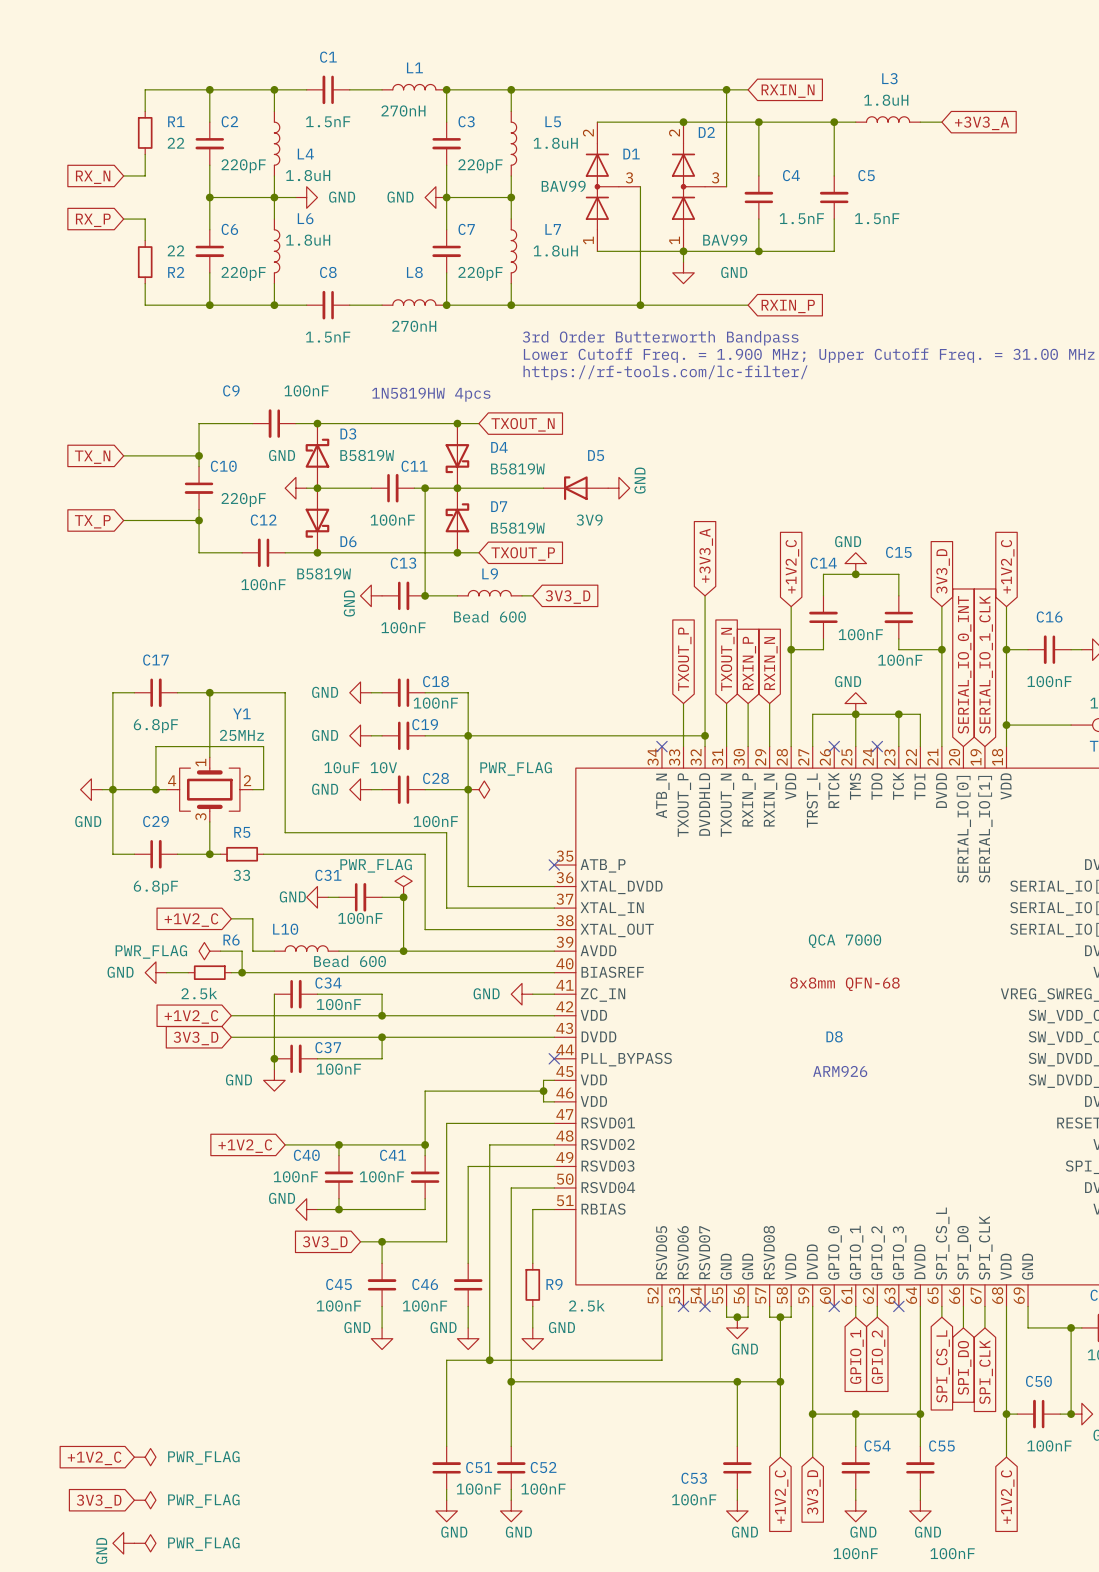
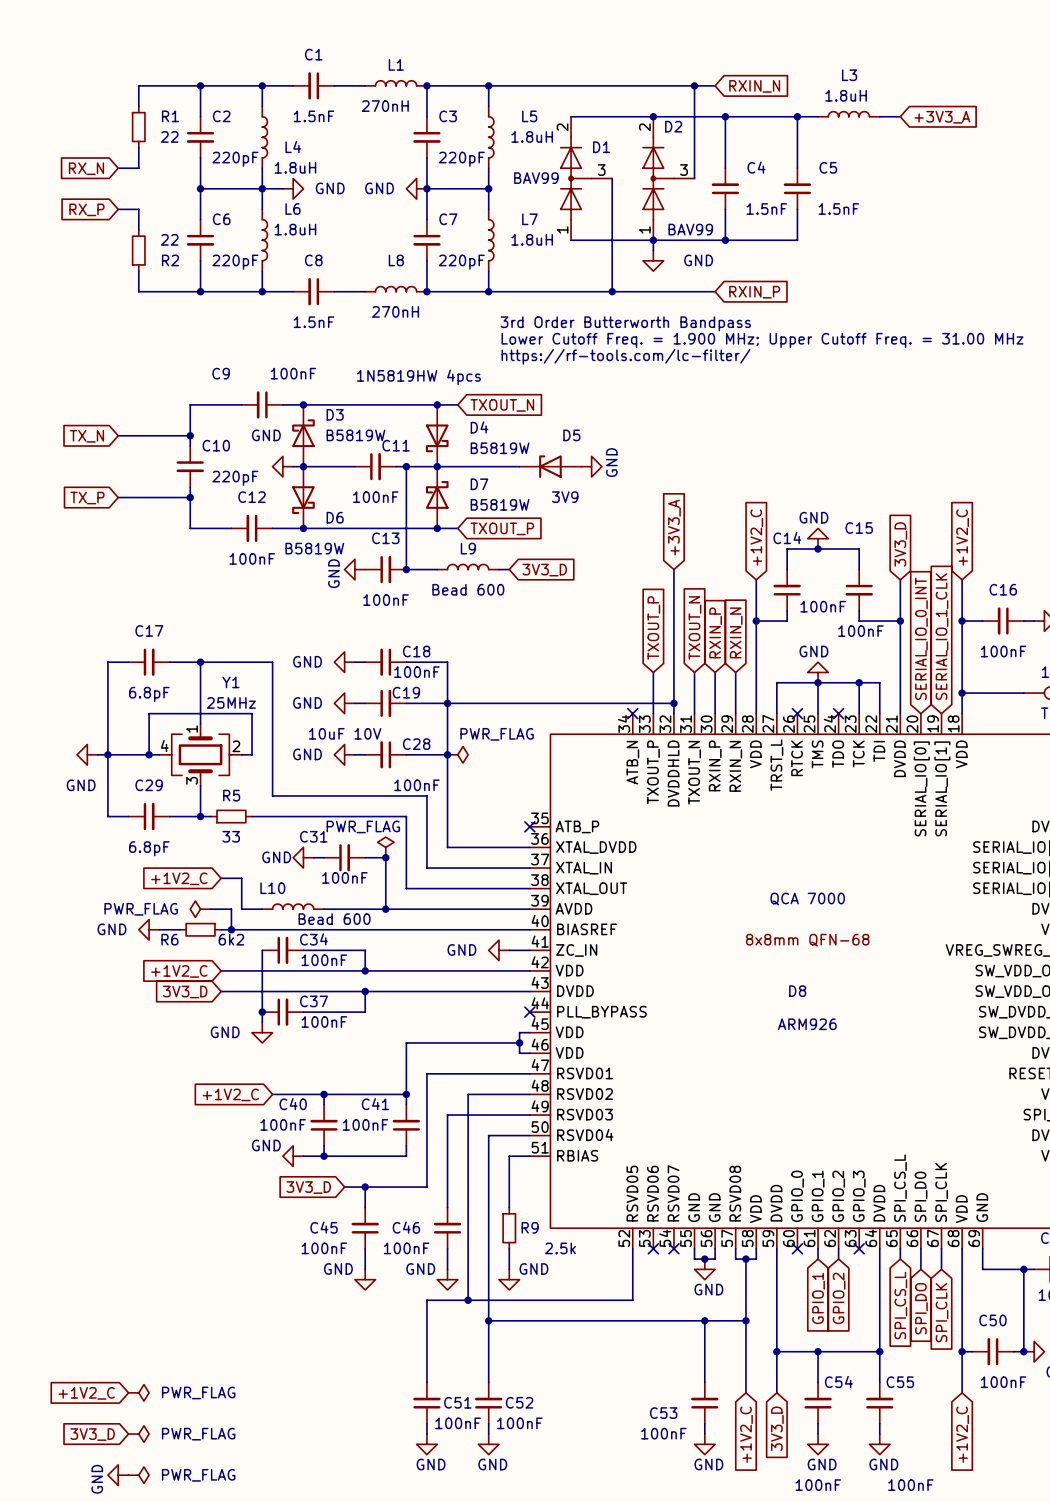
R6 name position: R6 (231, 940) -> R6 (169, 939)
R6 value: 2.5k (199, 993) -> 6k2 (231, 939)

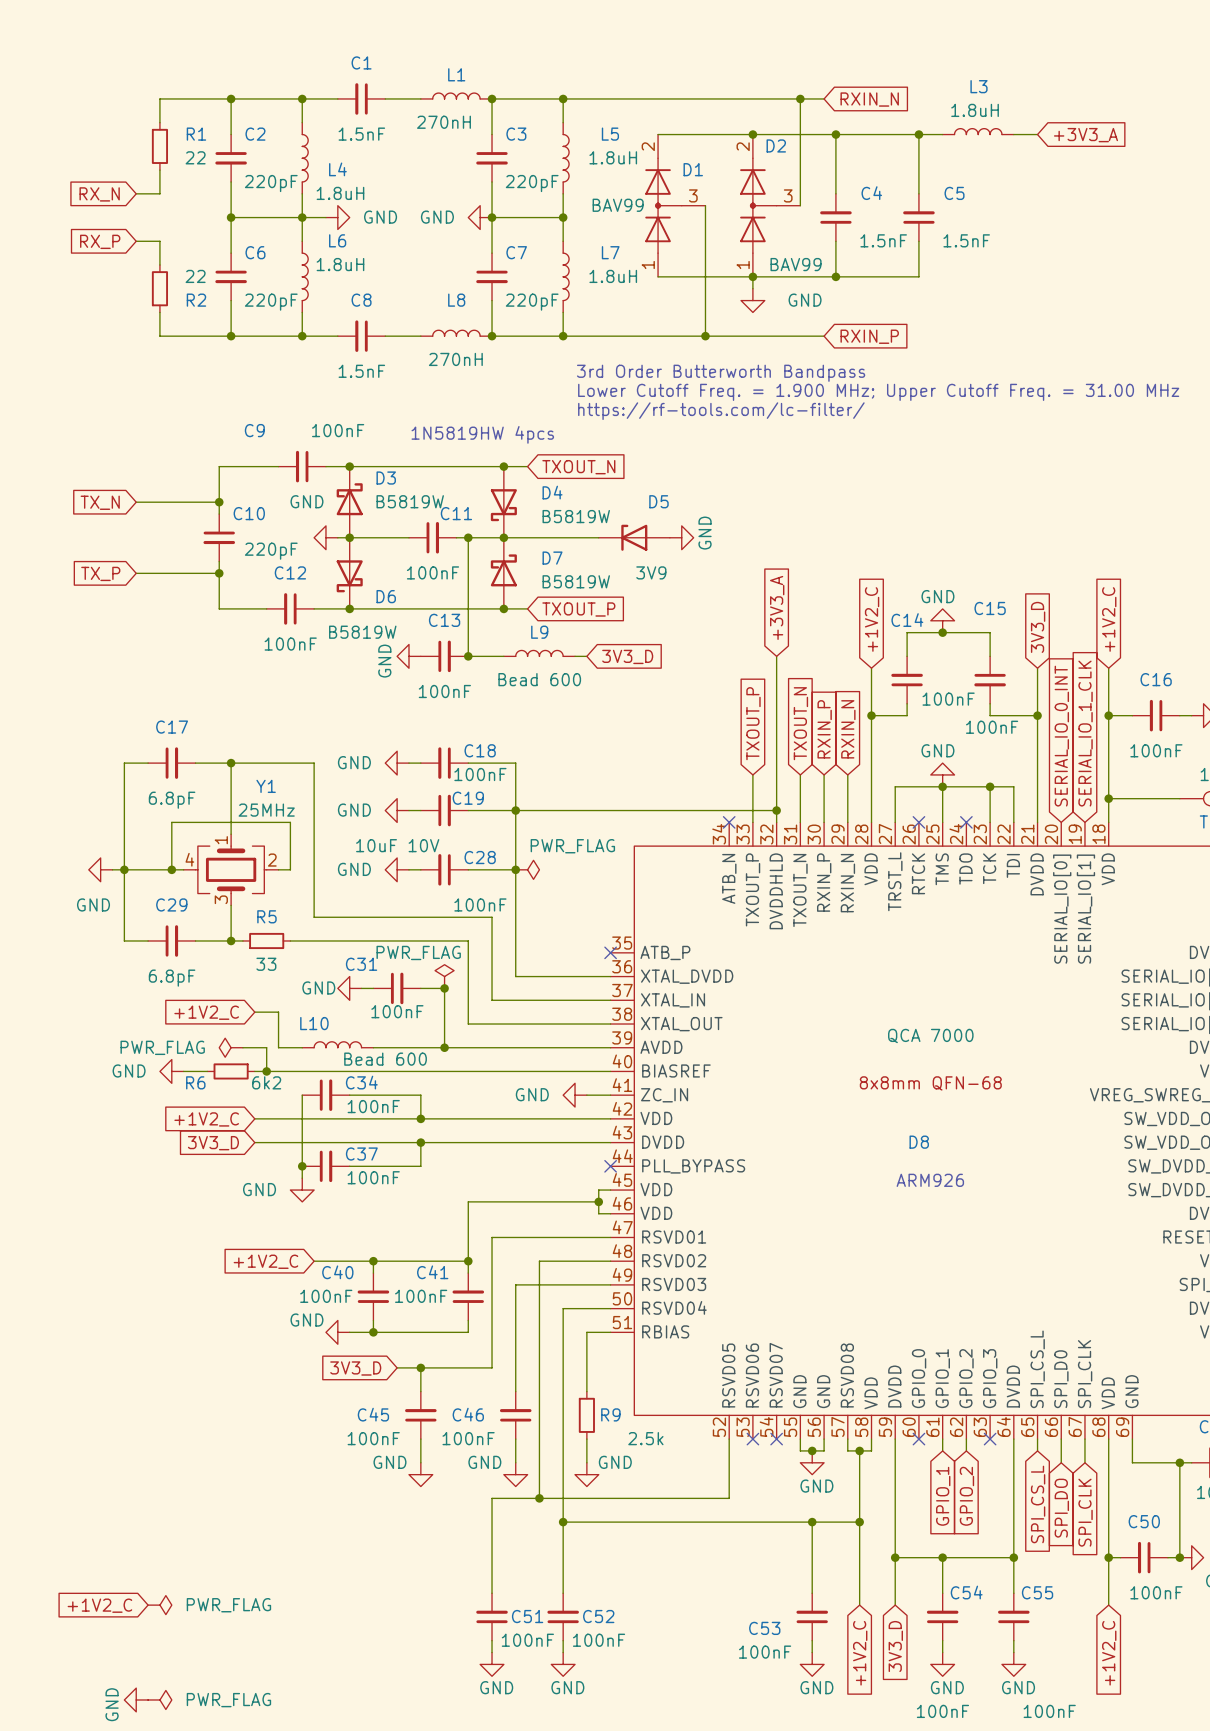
global label: 3V3_D (92, 1434) -> none
power symbol: PWR_FLAG (138, 1434) -> none

